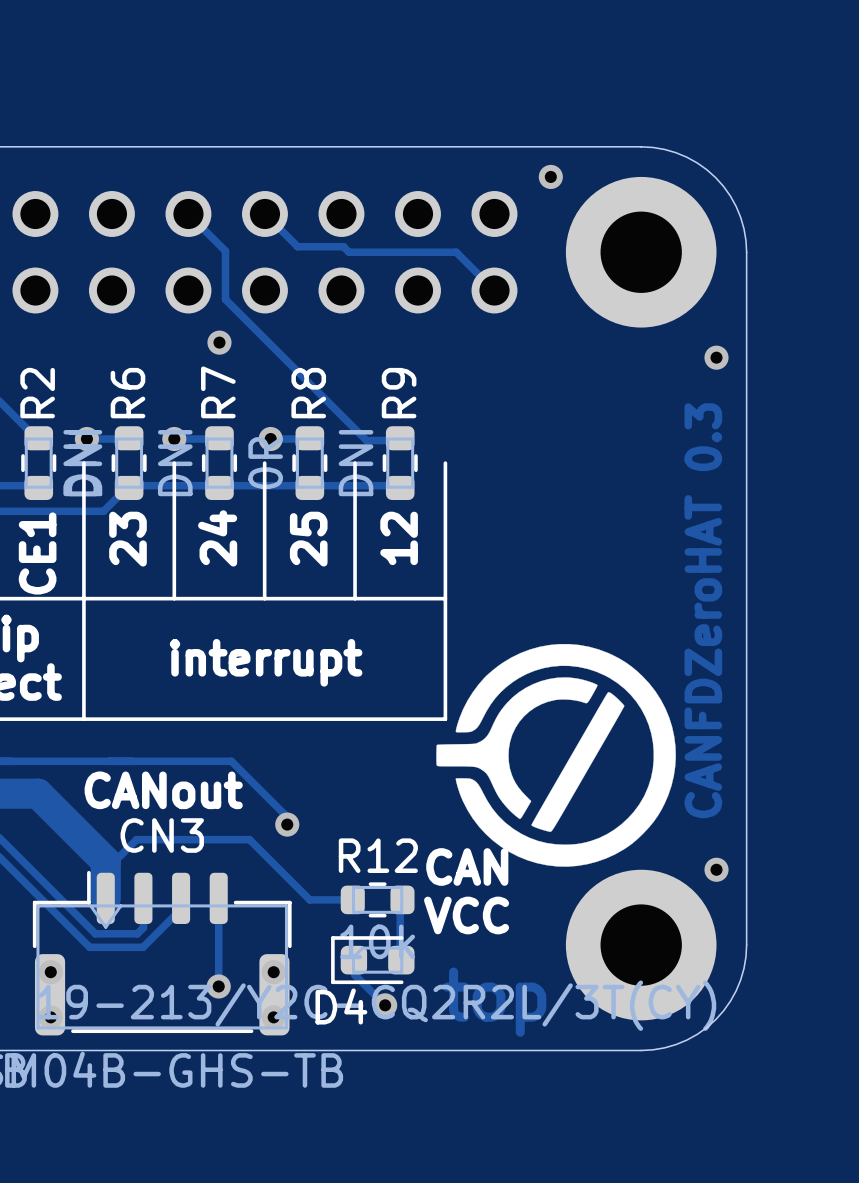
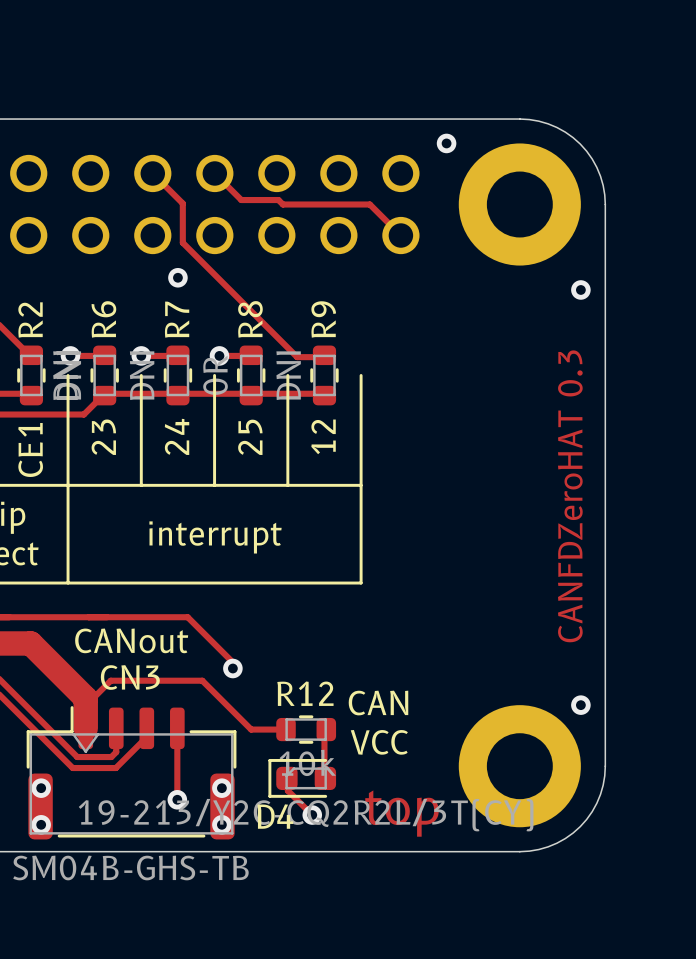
drawing: [436, 644, 676, 867] -> none

